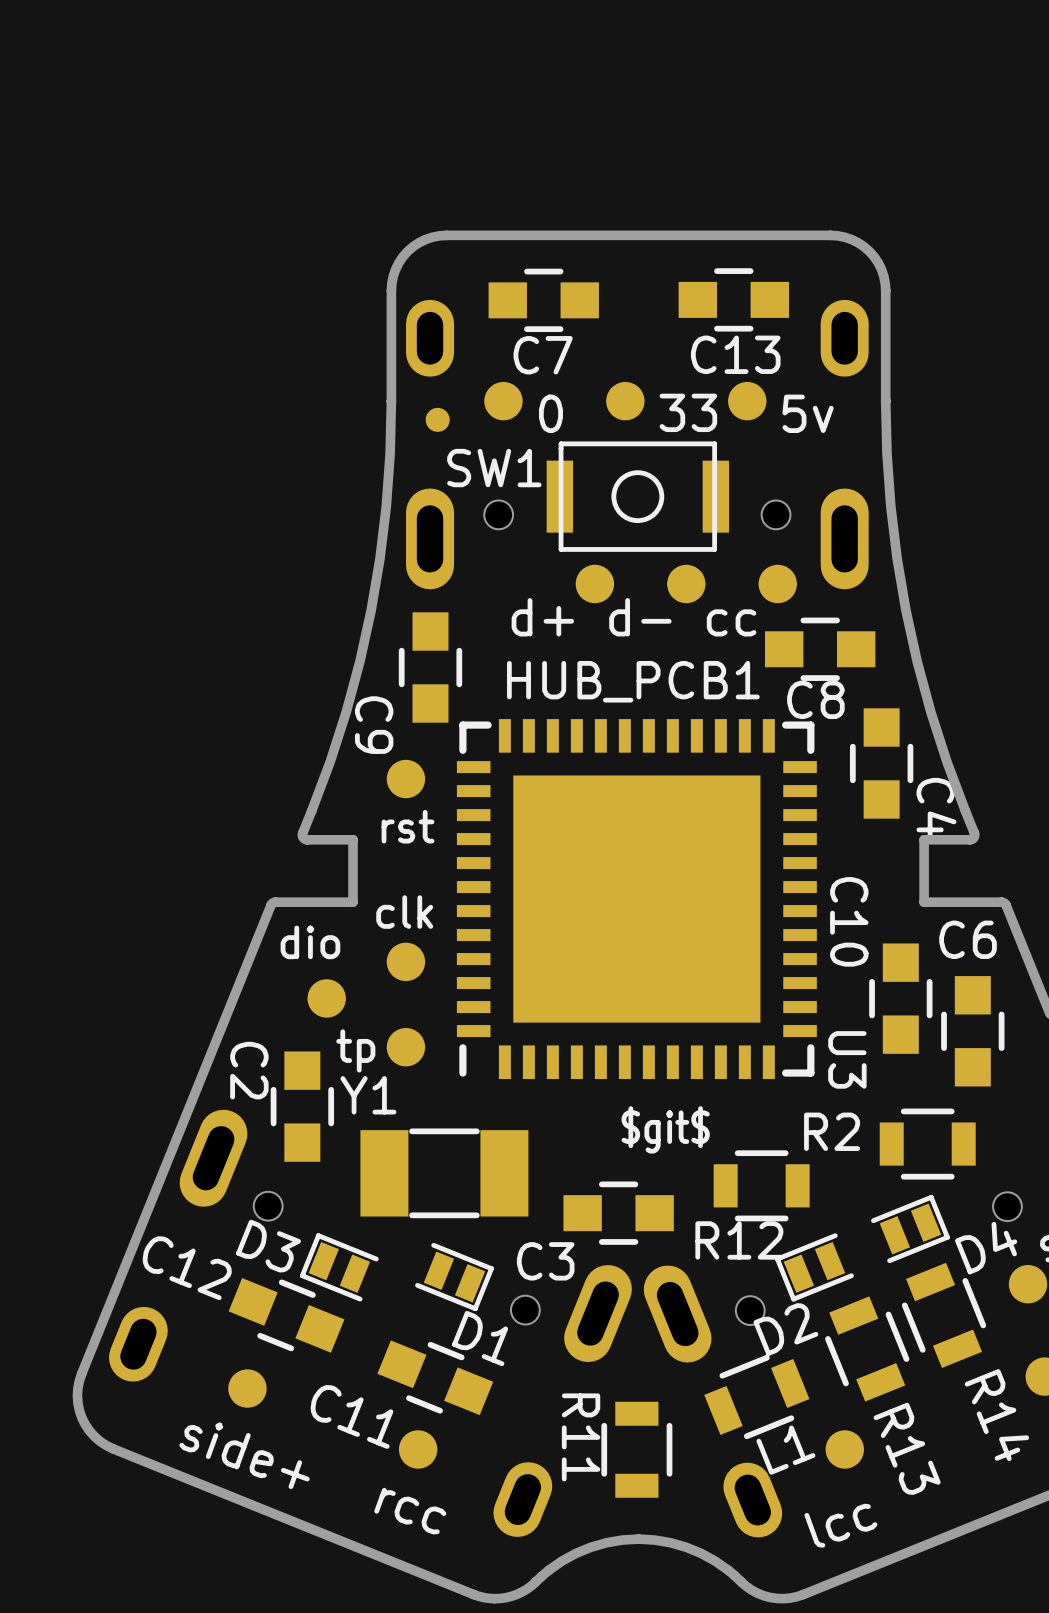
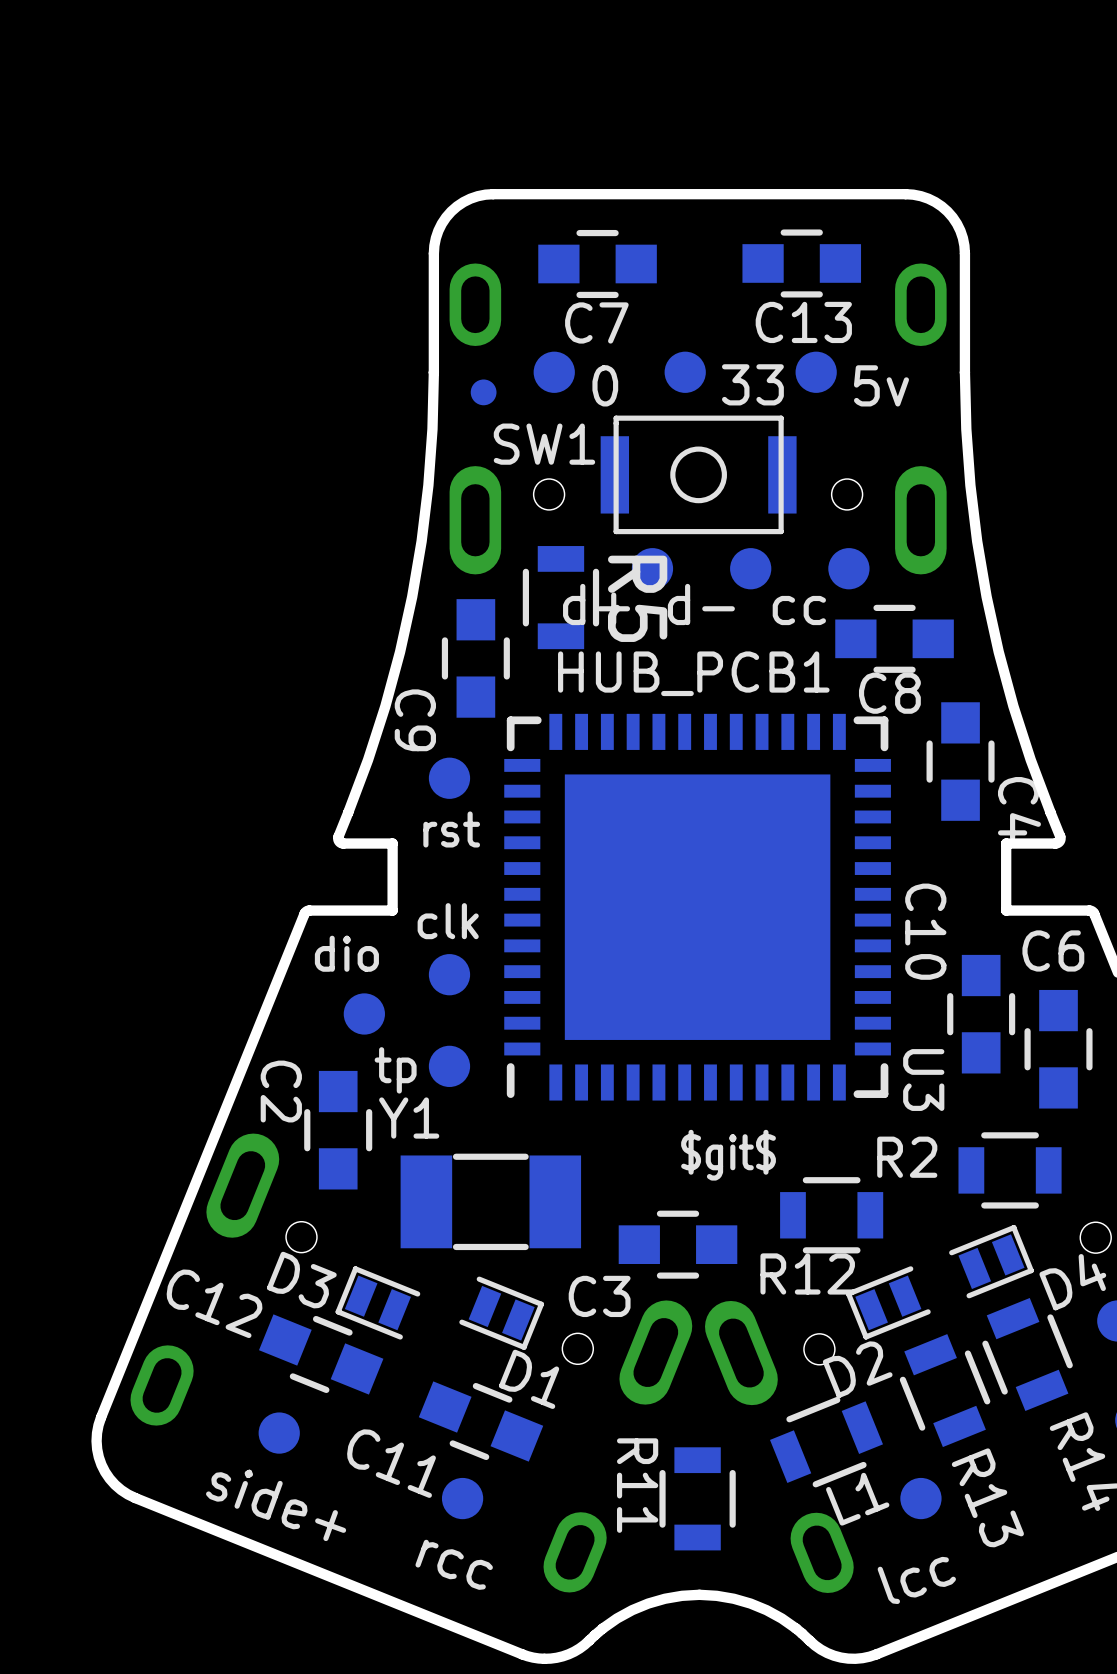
R5: none -> (560, 597)

